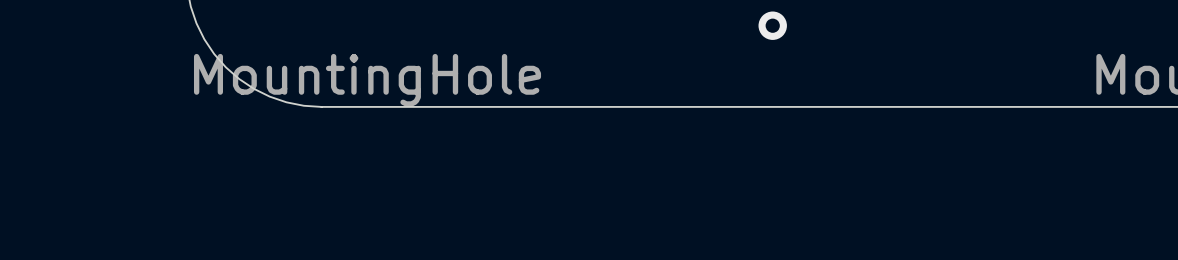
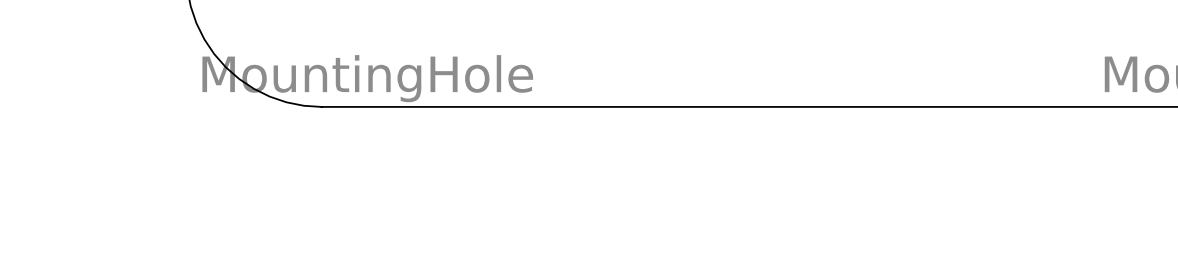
via: (772, 25) -> none

